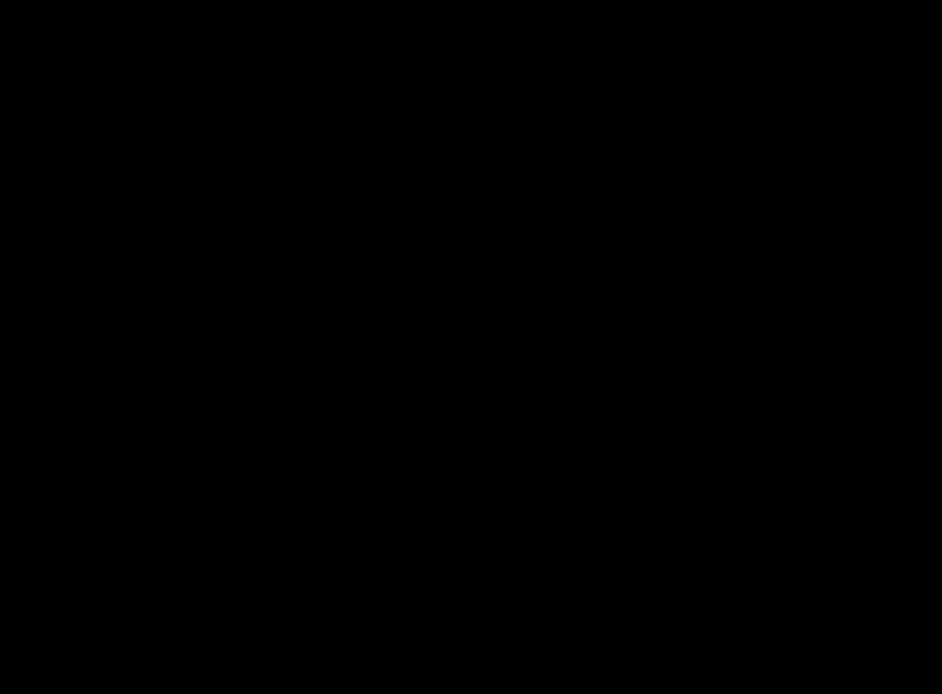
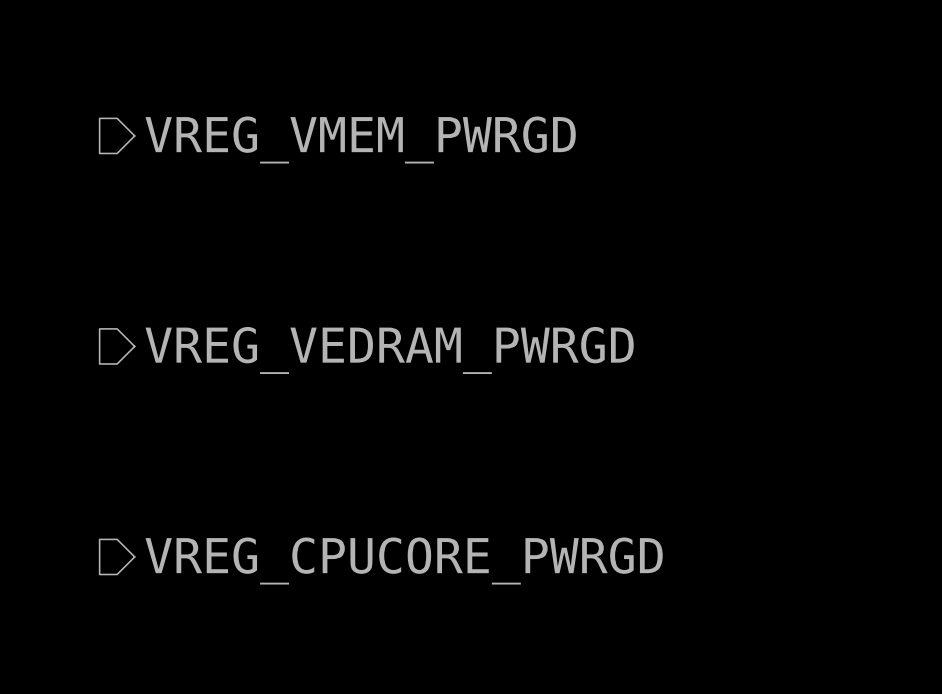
hierarchical label: none -> VREG_VMEM_PWRGD (360, 139)
hierarchical label: none -> VREG_VEDRAM_PWRGD (389, 350)
hierarchical label: none -> VREG_CPUCORE_PWRGD (404, 560)

